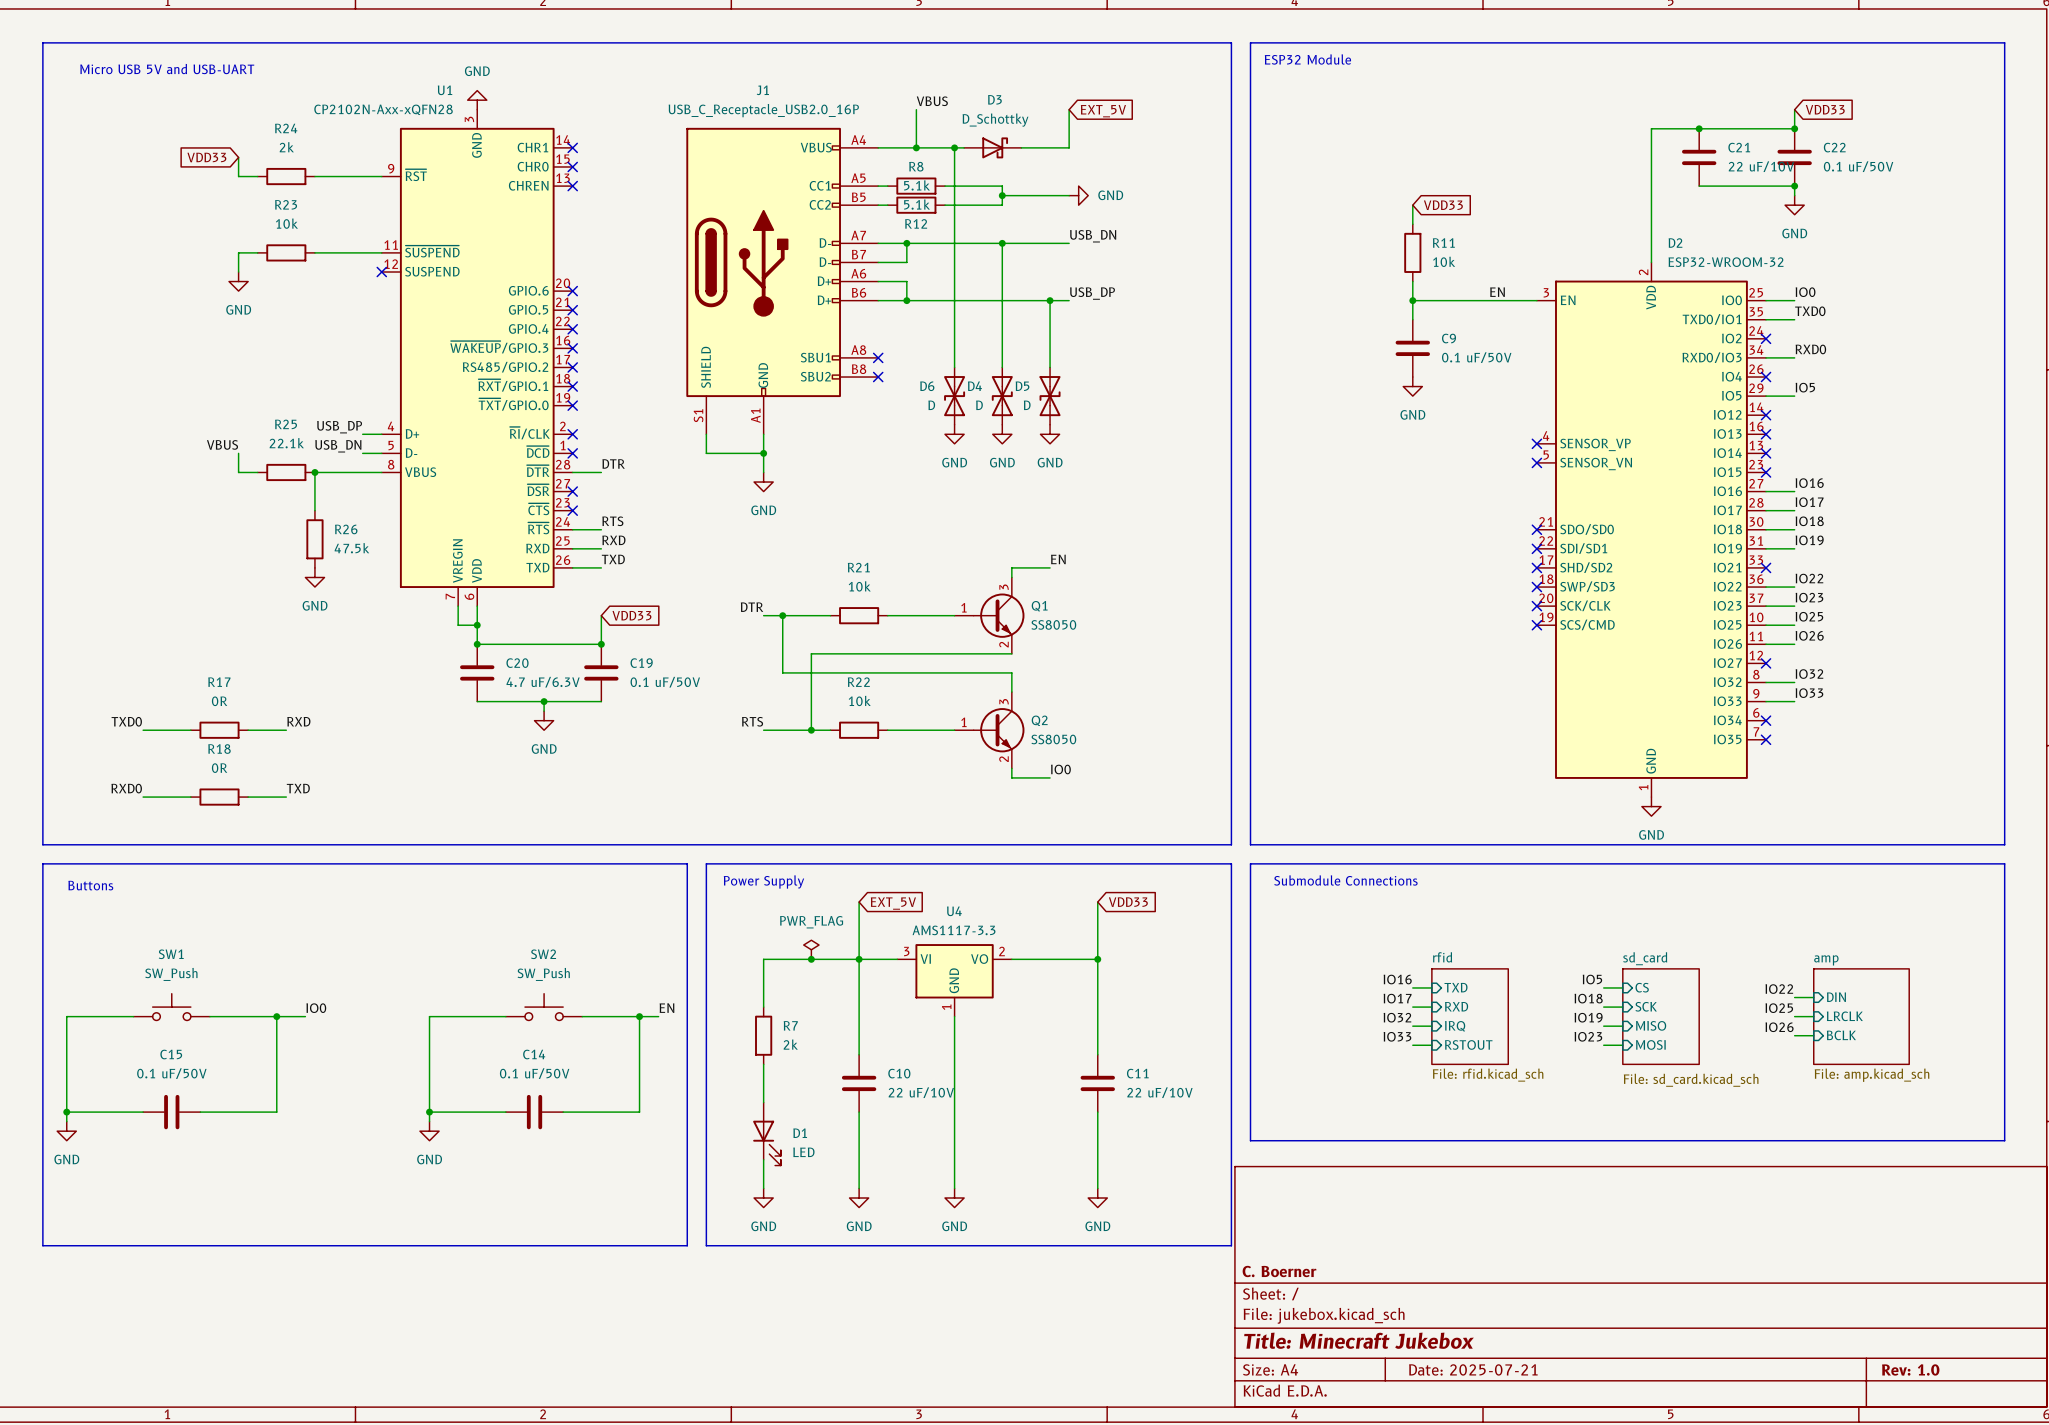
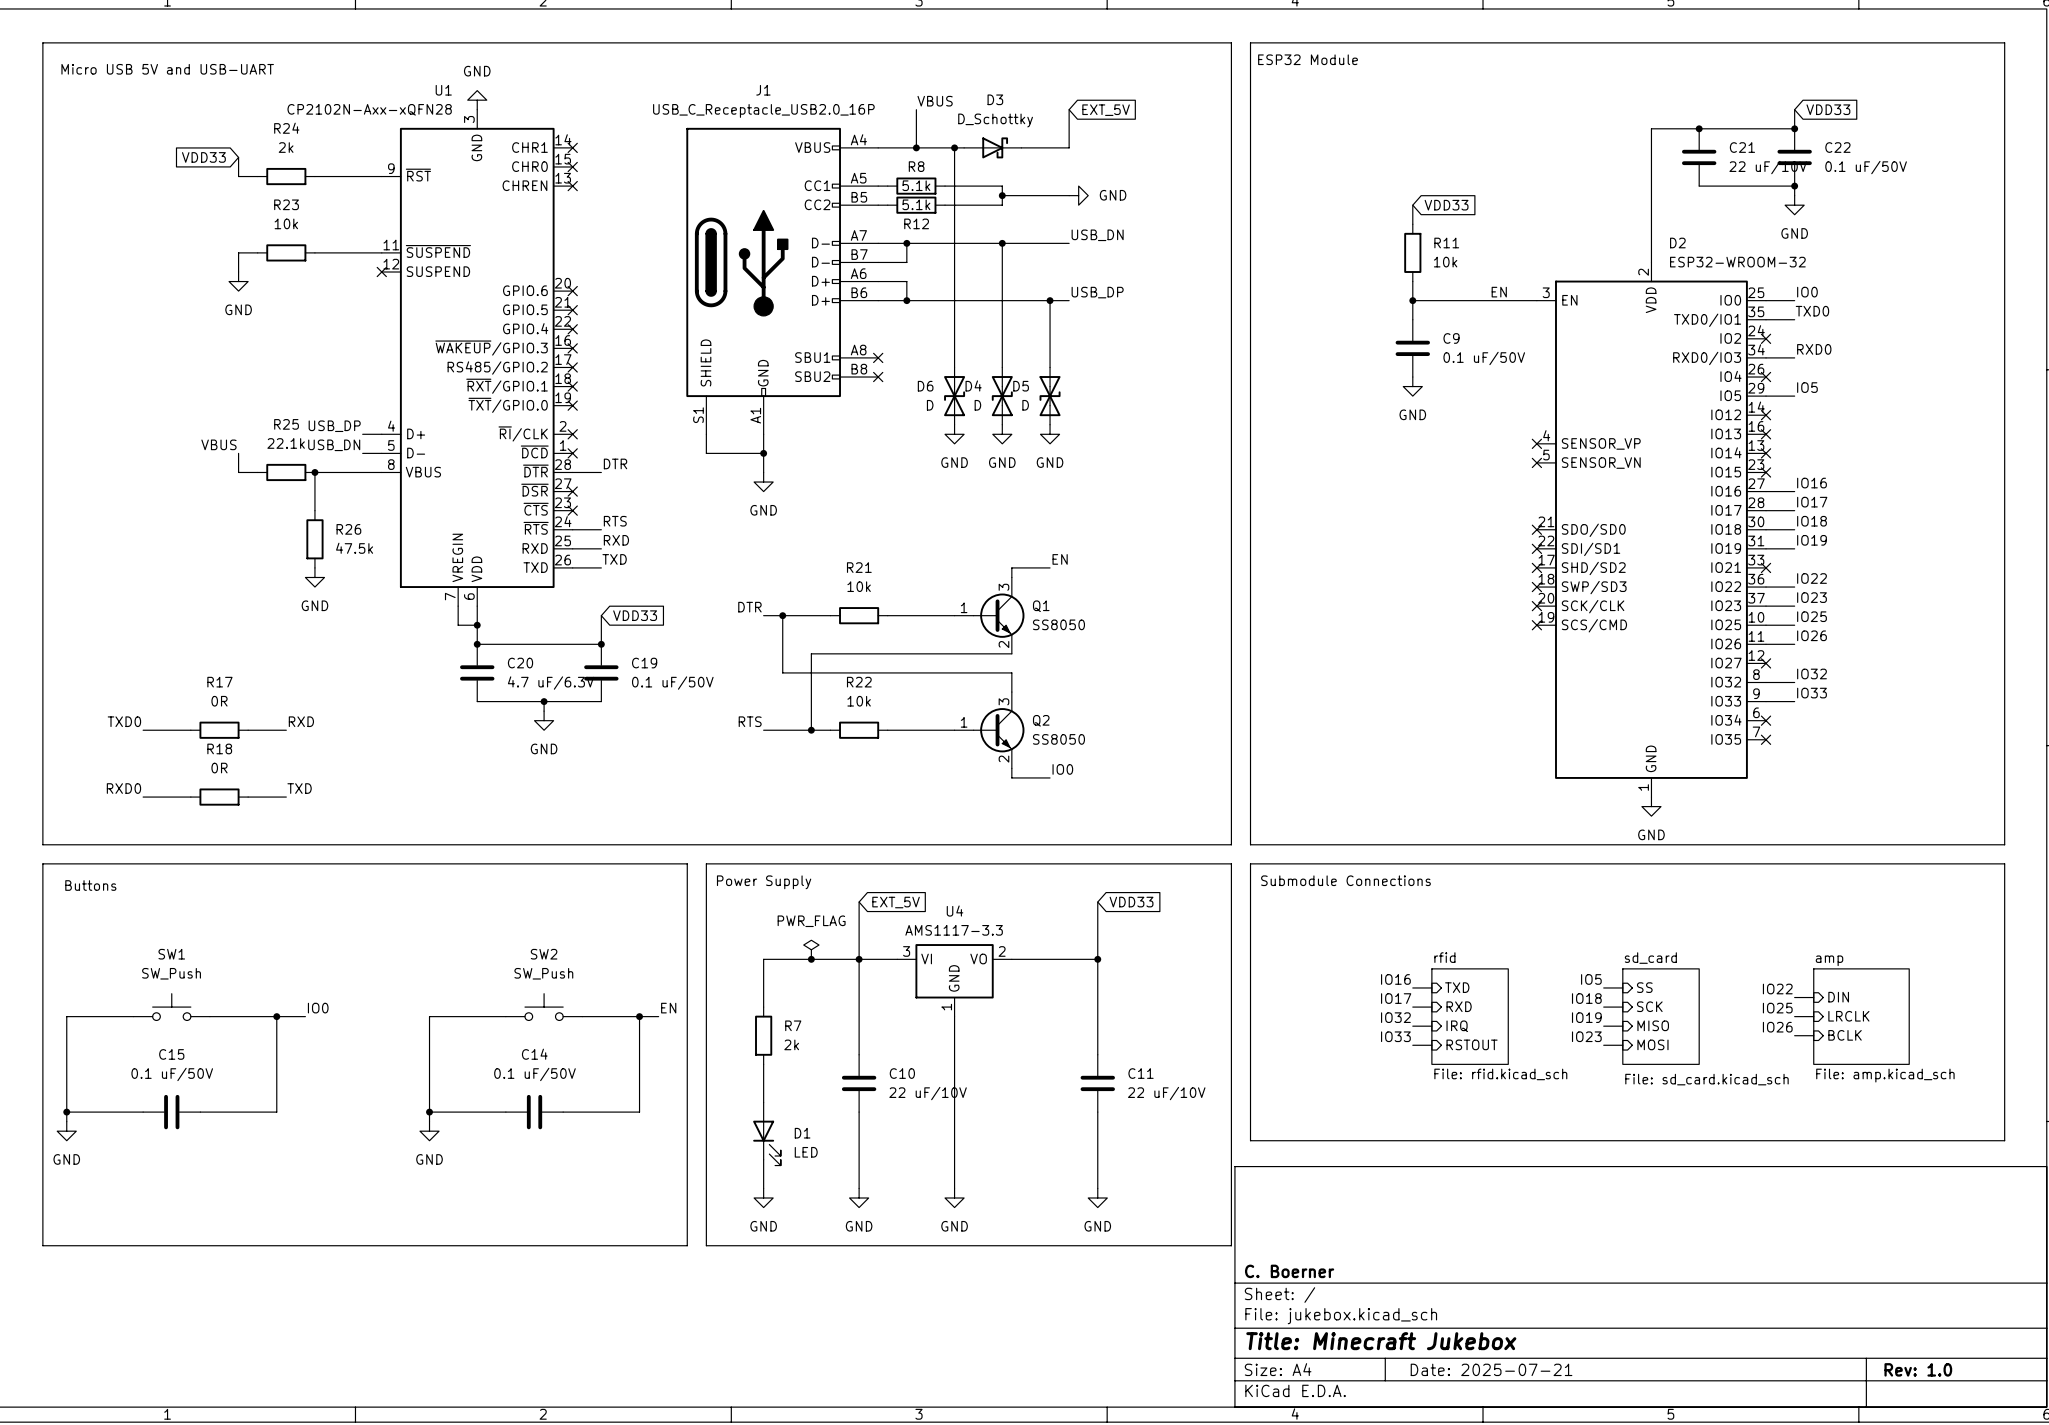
sheet pin: CS (1642, 987) -> SS (1644, 987)

